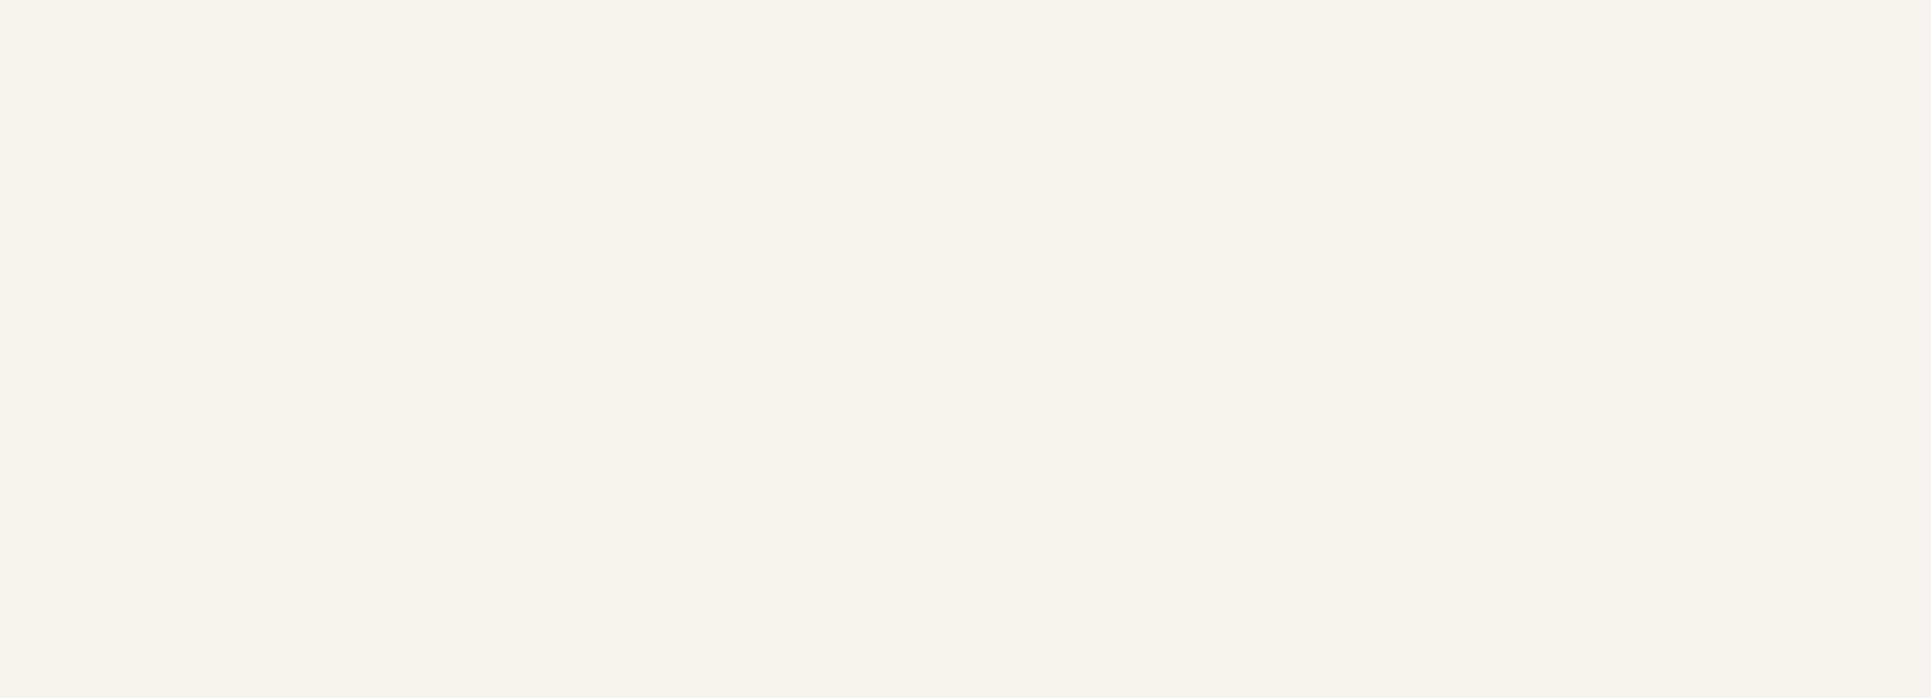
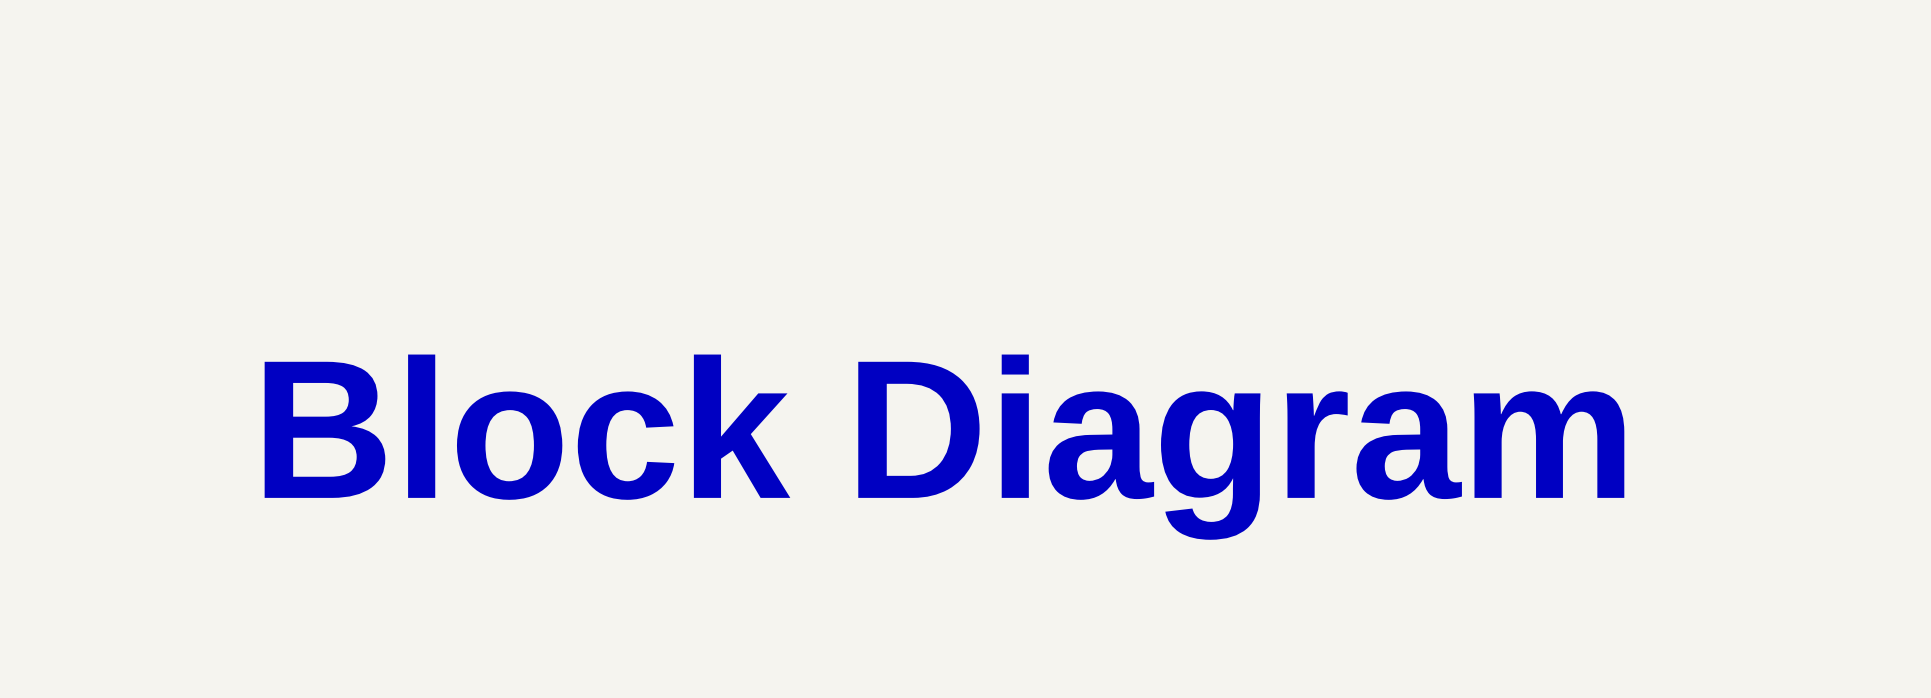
text: none -> Block Diagram (944, 447)

